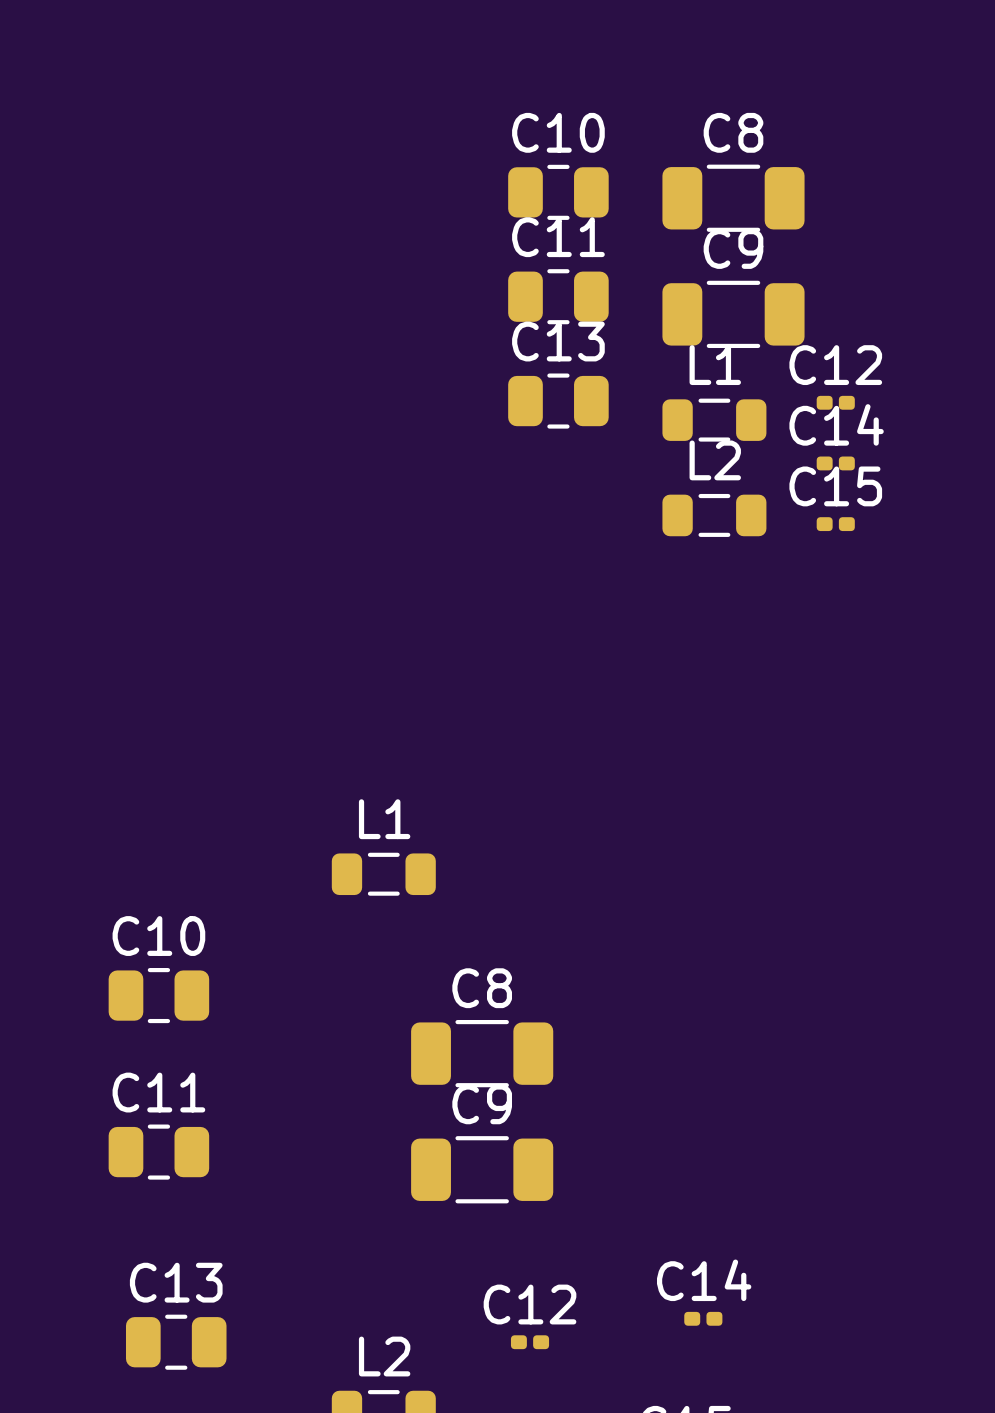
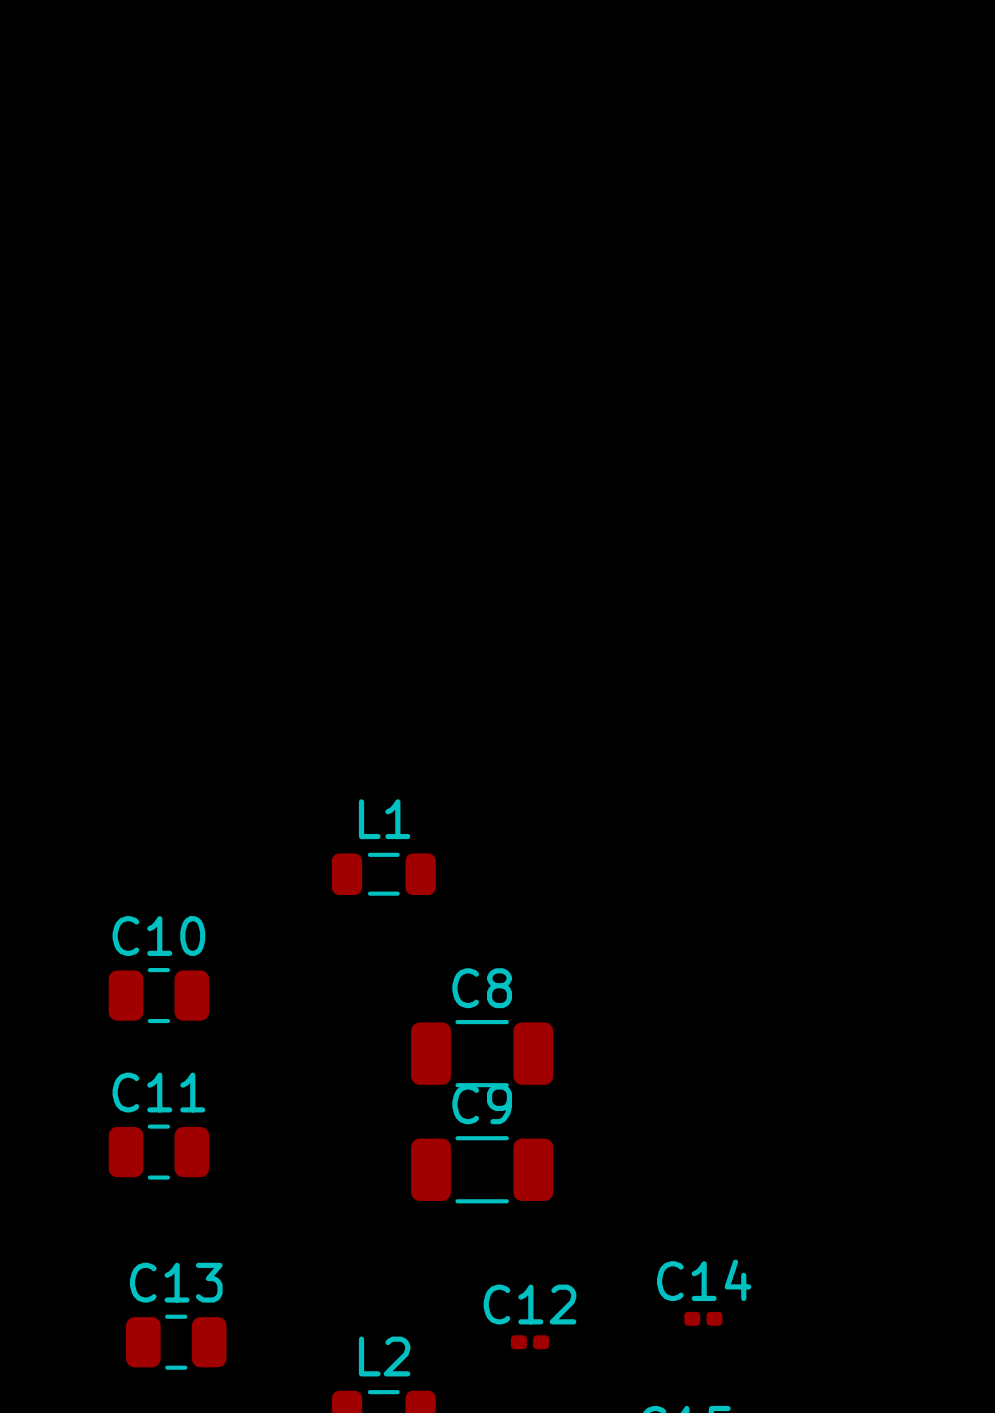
C10: (558, 192) -> none
C8: (733, 198) -> none
C11: (558, 296) -> none
C9: (733, 314) -> none
C13: (558, 401) -> none
C12: (835, 402) -> none
L1: (714, 420) -> none
C14: (835, 463) -> none
L2: (714, 515) -> none
C15: (835, 524) -> none

